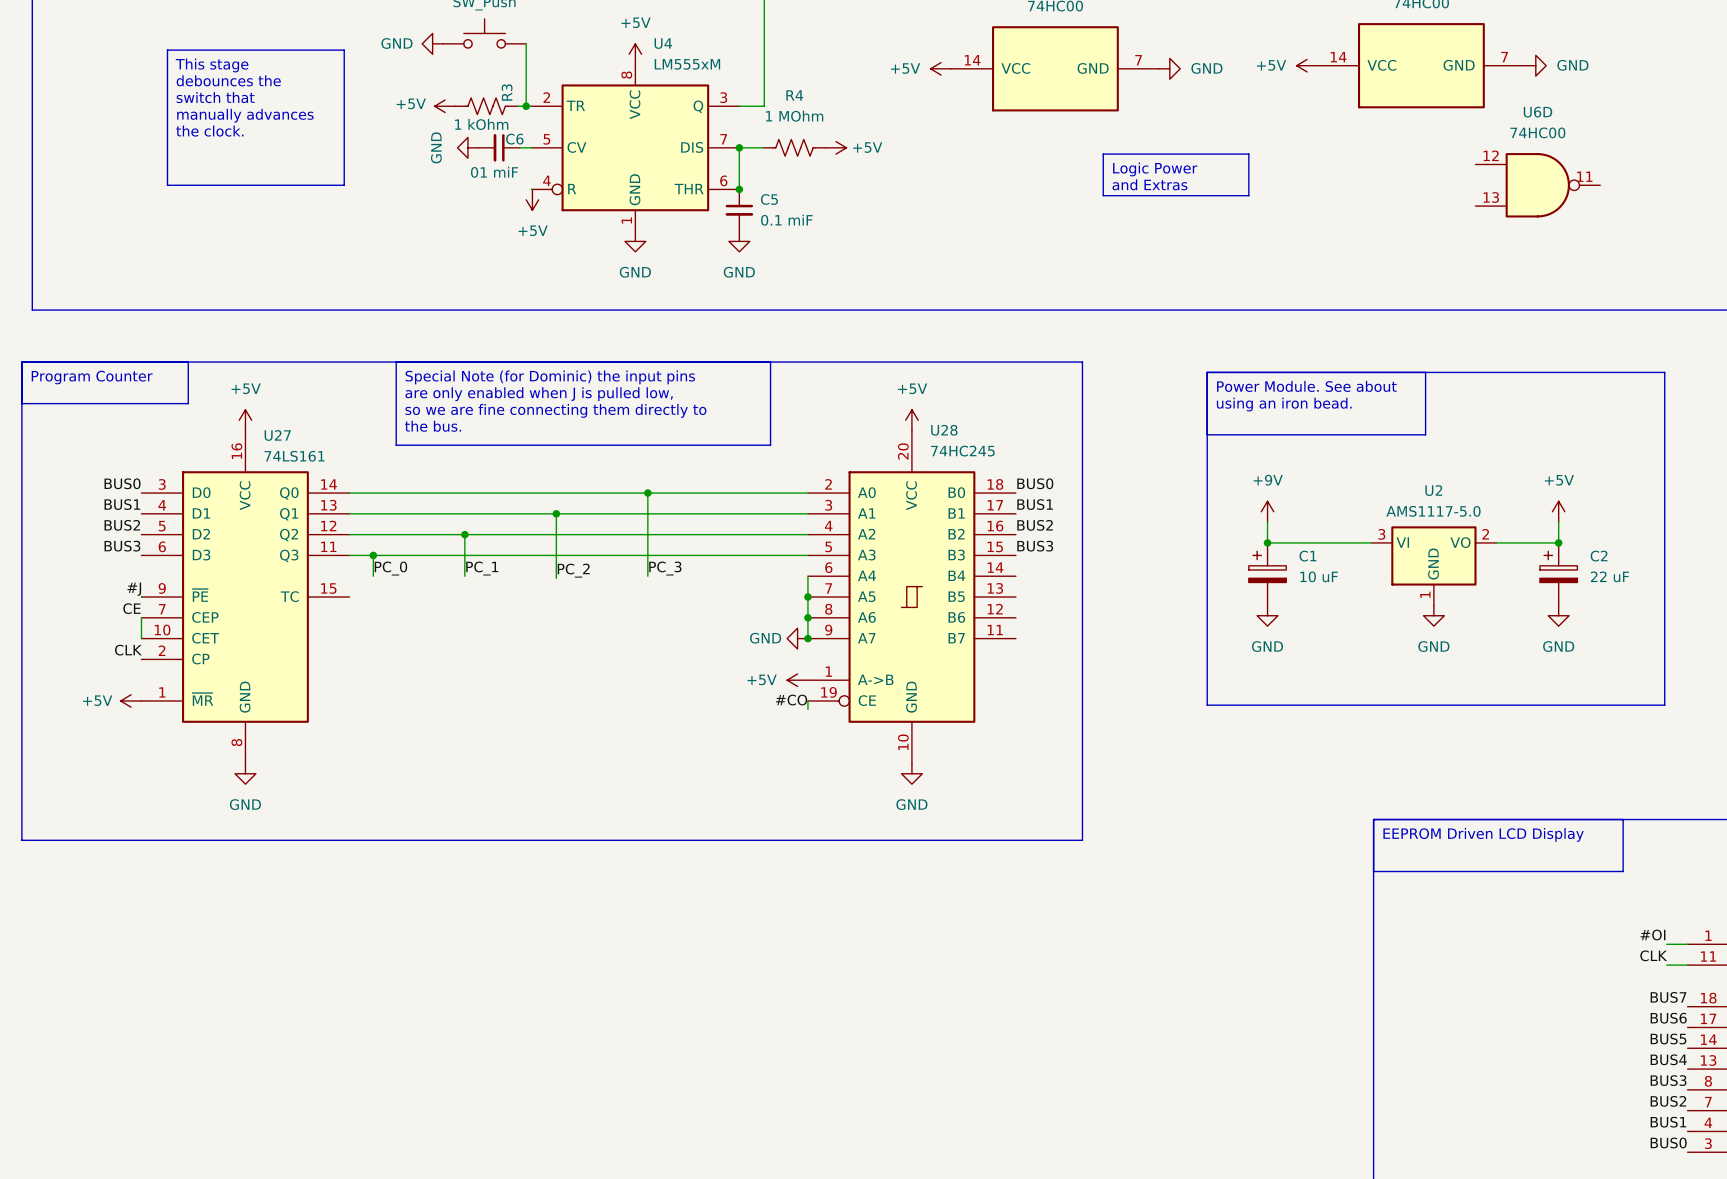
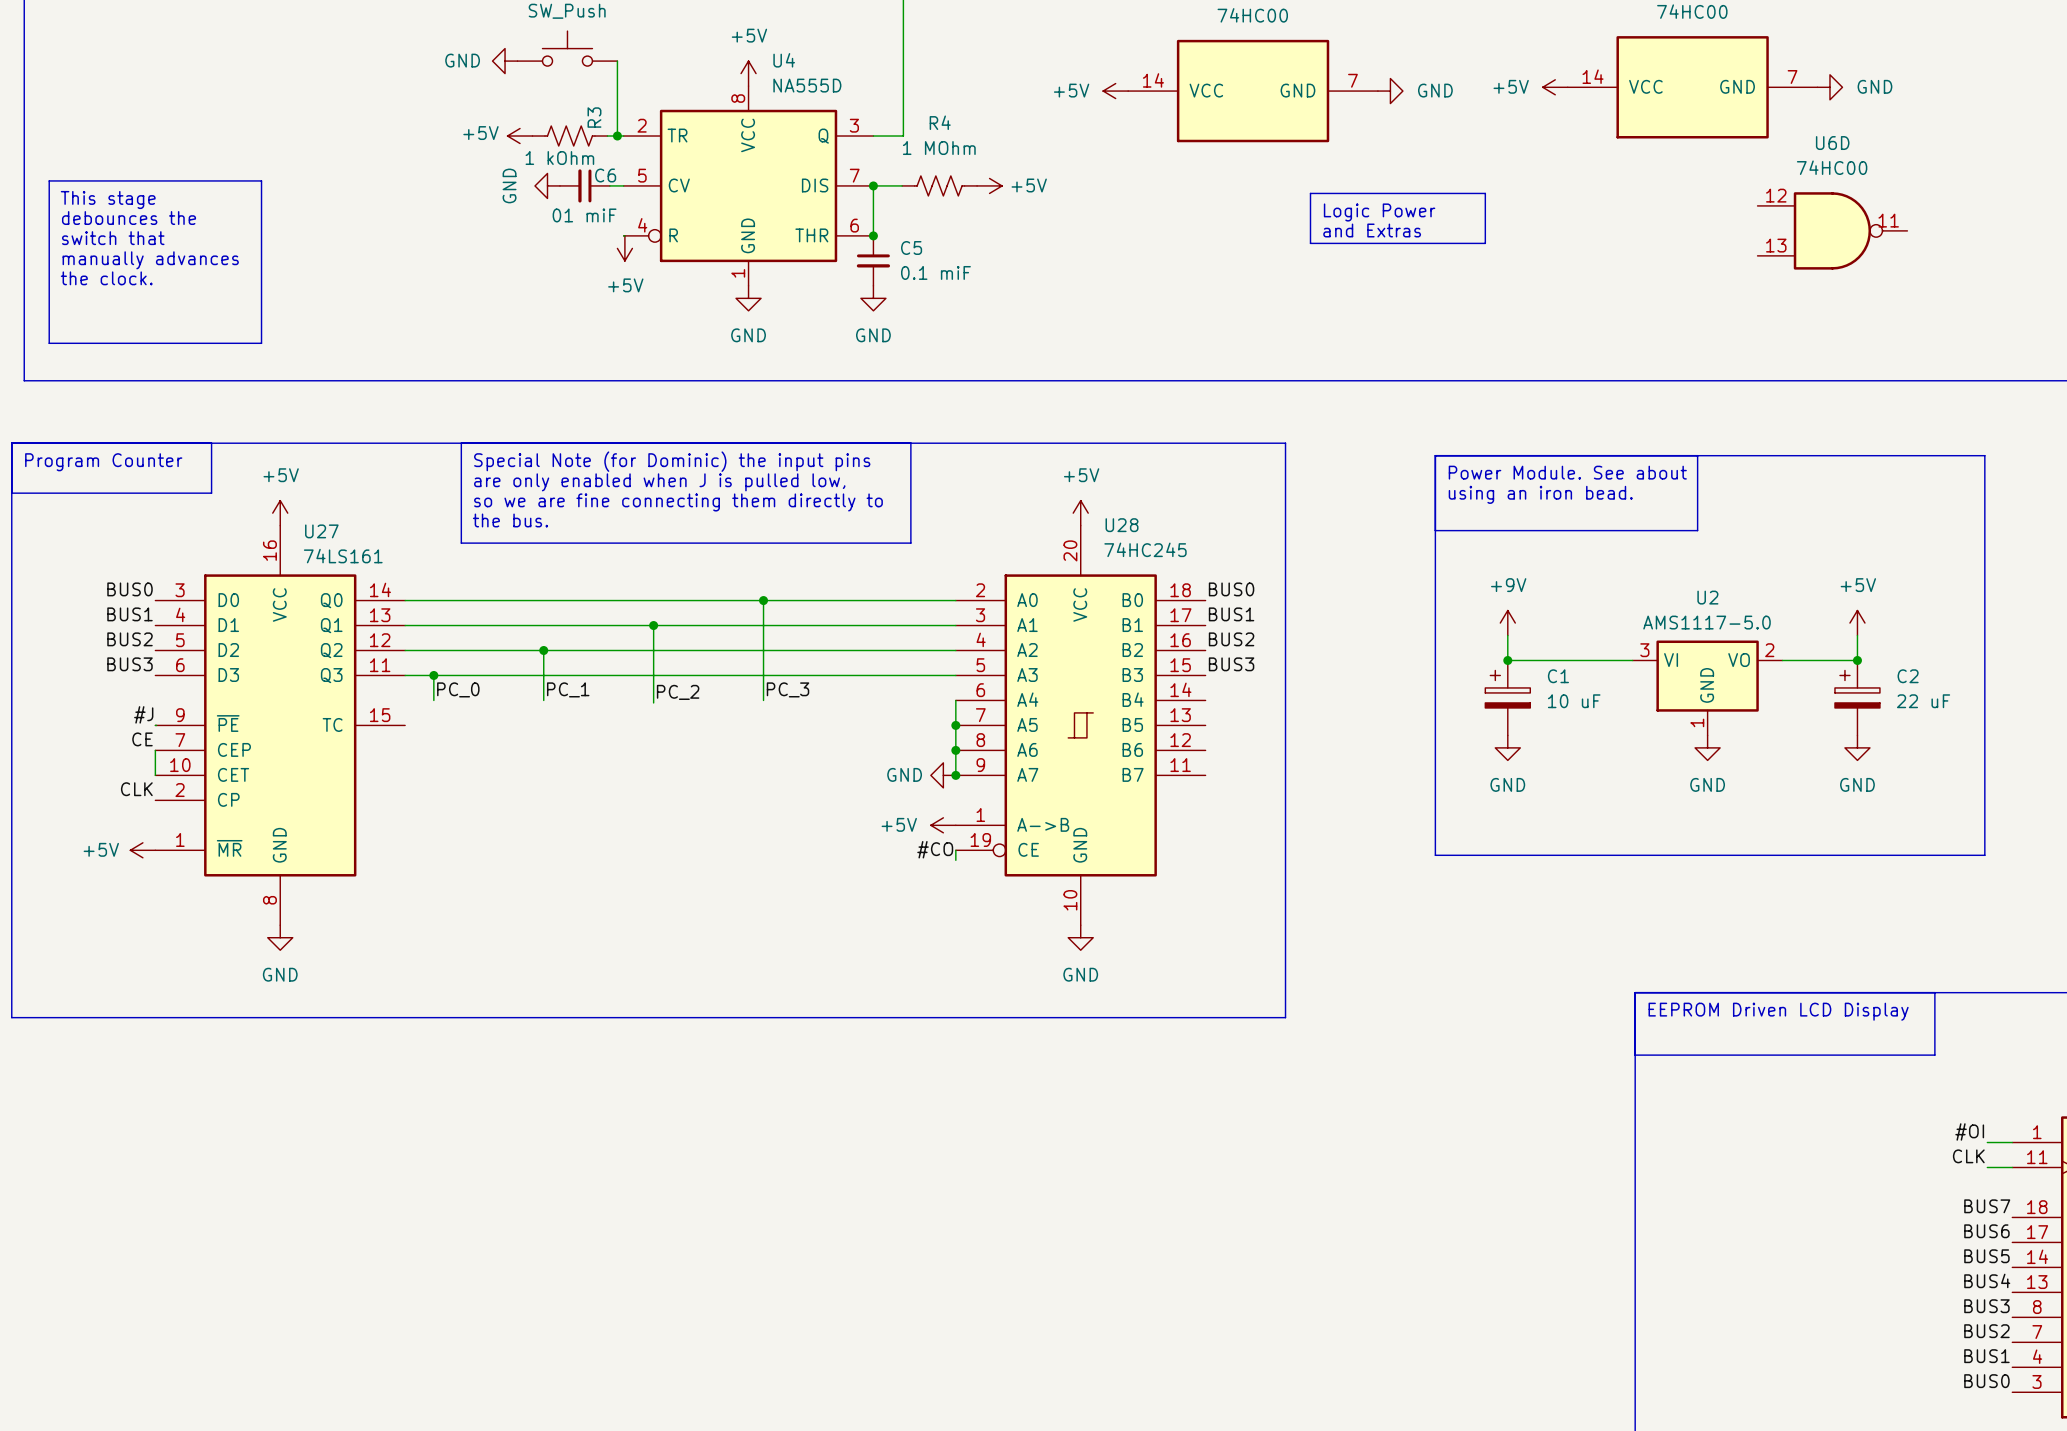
line: (167, 50) (344, 50) (344, 185) (167, 185) (167, 50) -> (49, 180) (261, 180) (261, 343) (49, 343) (49, 180)
U4 value: LM555xM (687, 64) -> NA555D (807, 85)
text position: This stage (212, 65) -> This stage (108, 199)
text position: debounces the (228, 80) -> debounces the (129, 218)
text position: switch that (215, 97) -> switch that (113, 238)
text position: manually advances (245, 115) -> manually advances (150, 260)
text position: the clock. (209, 131) -> the clock. (106, 278)

